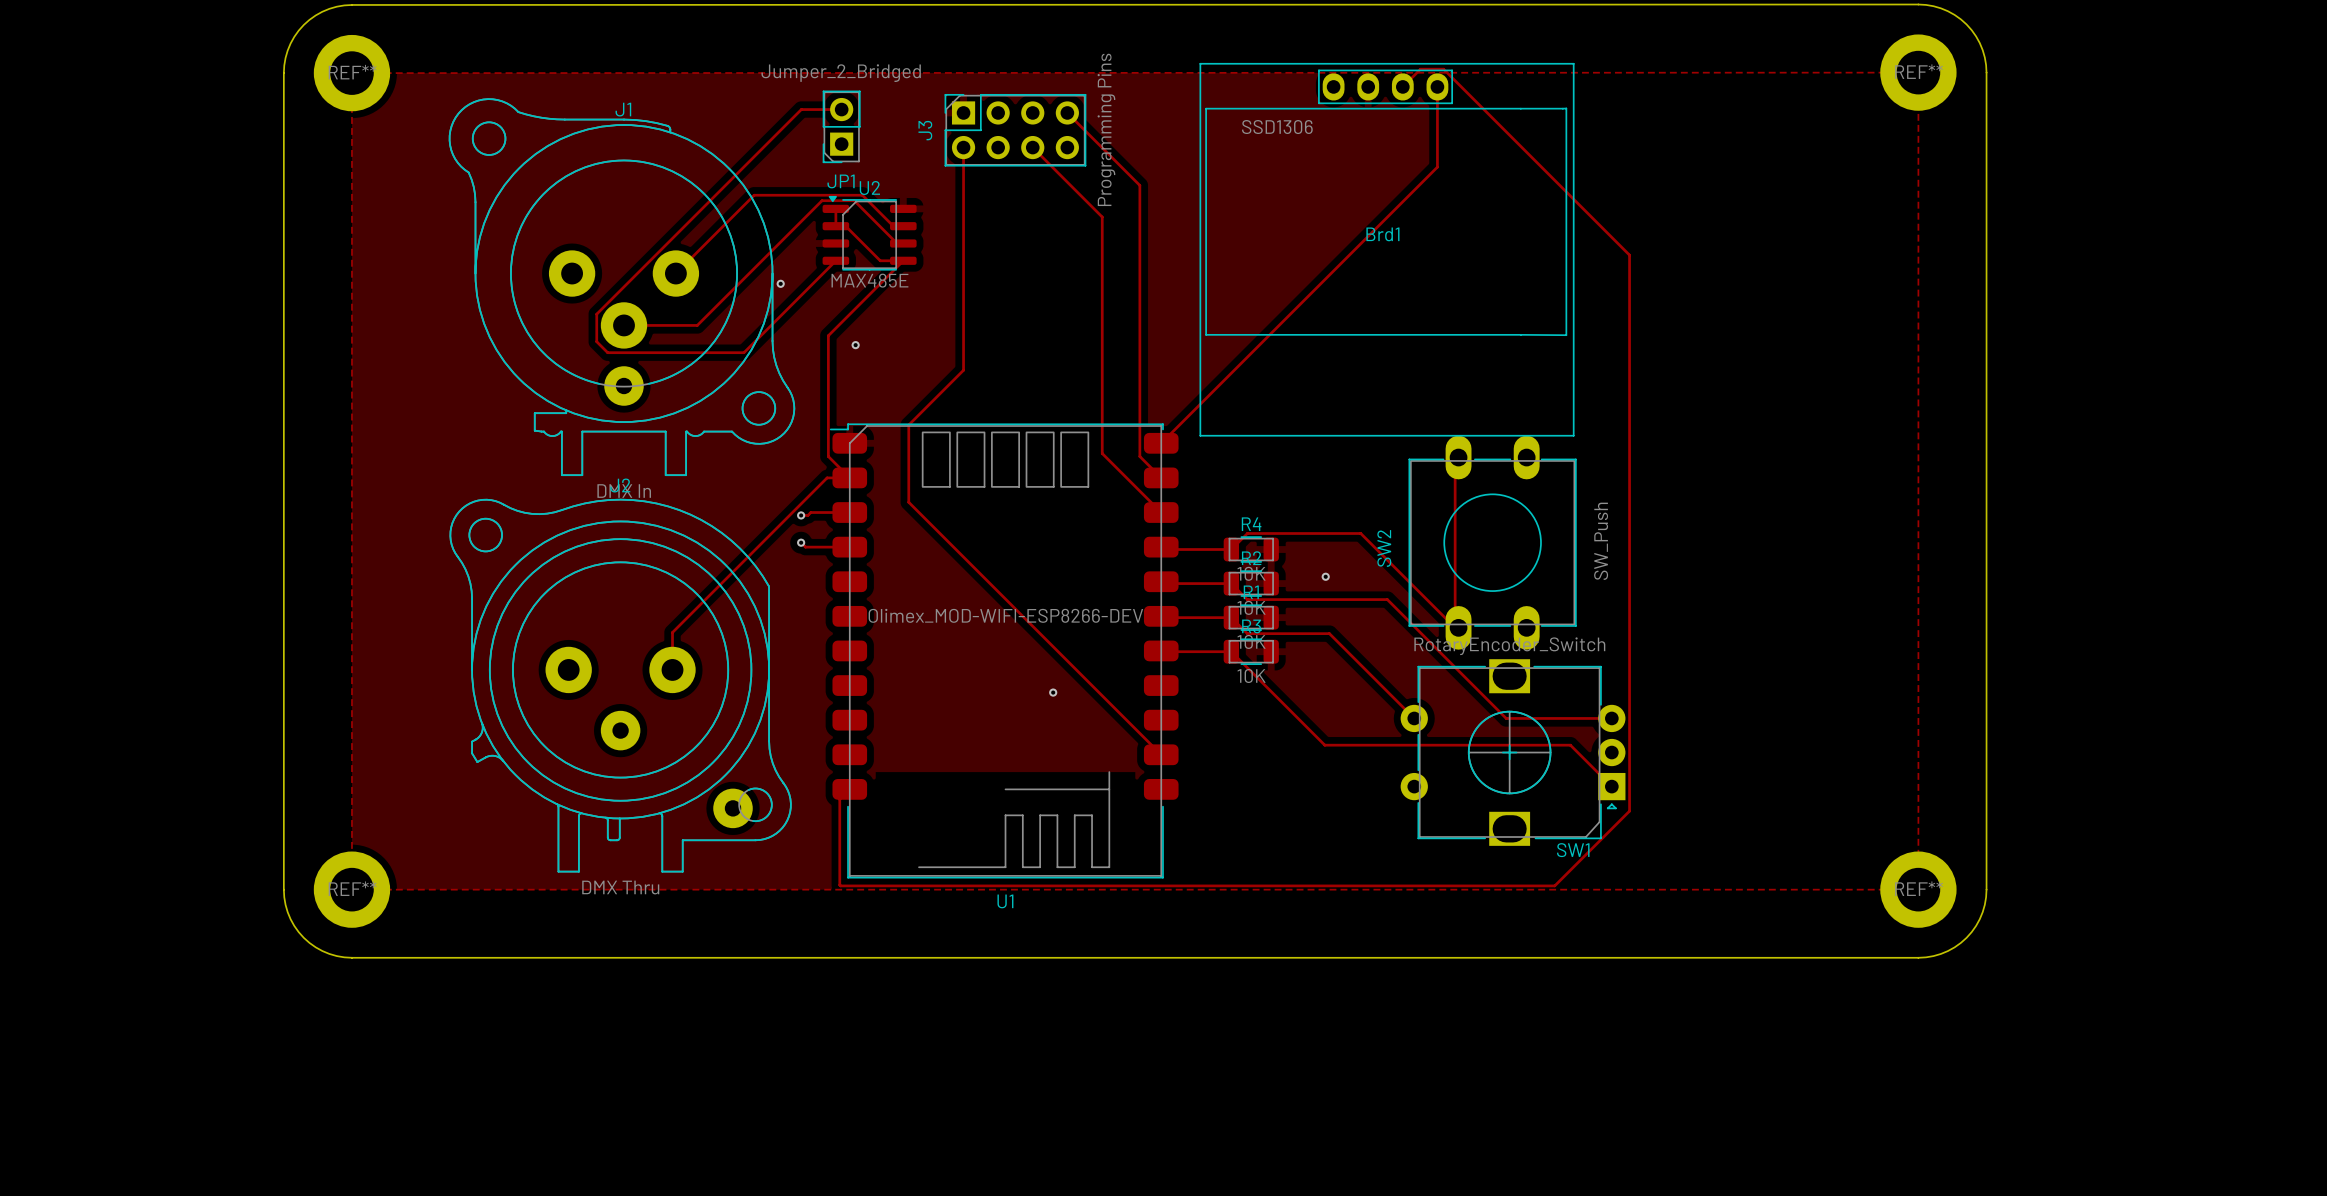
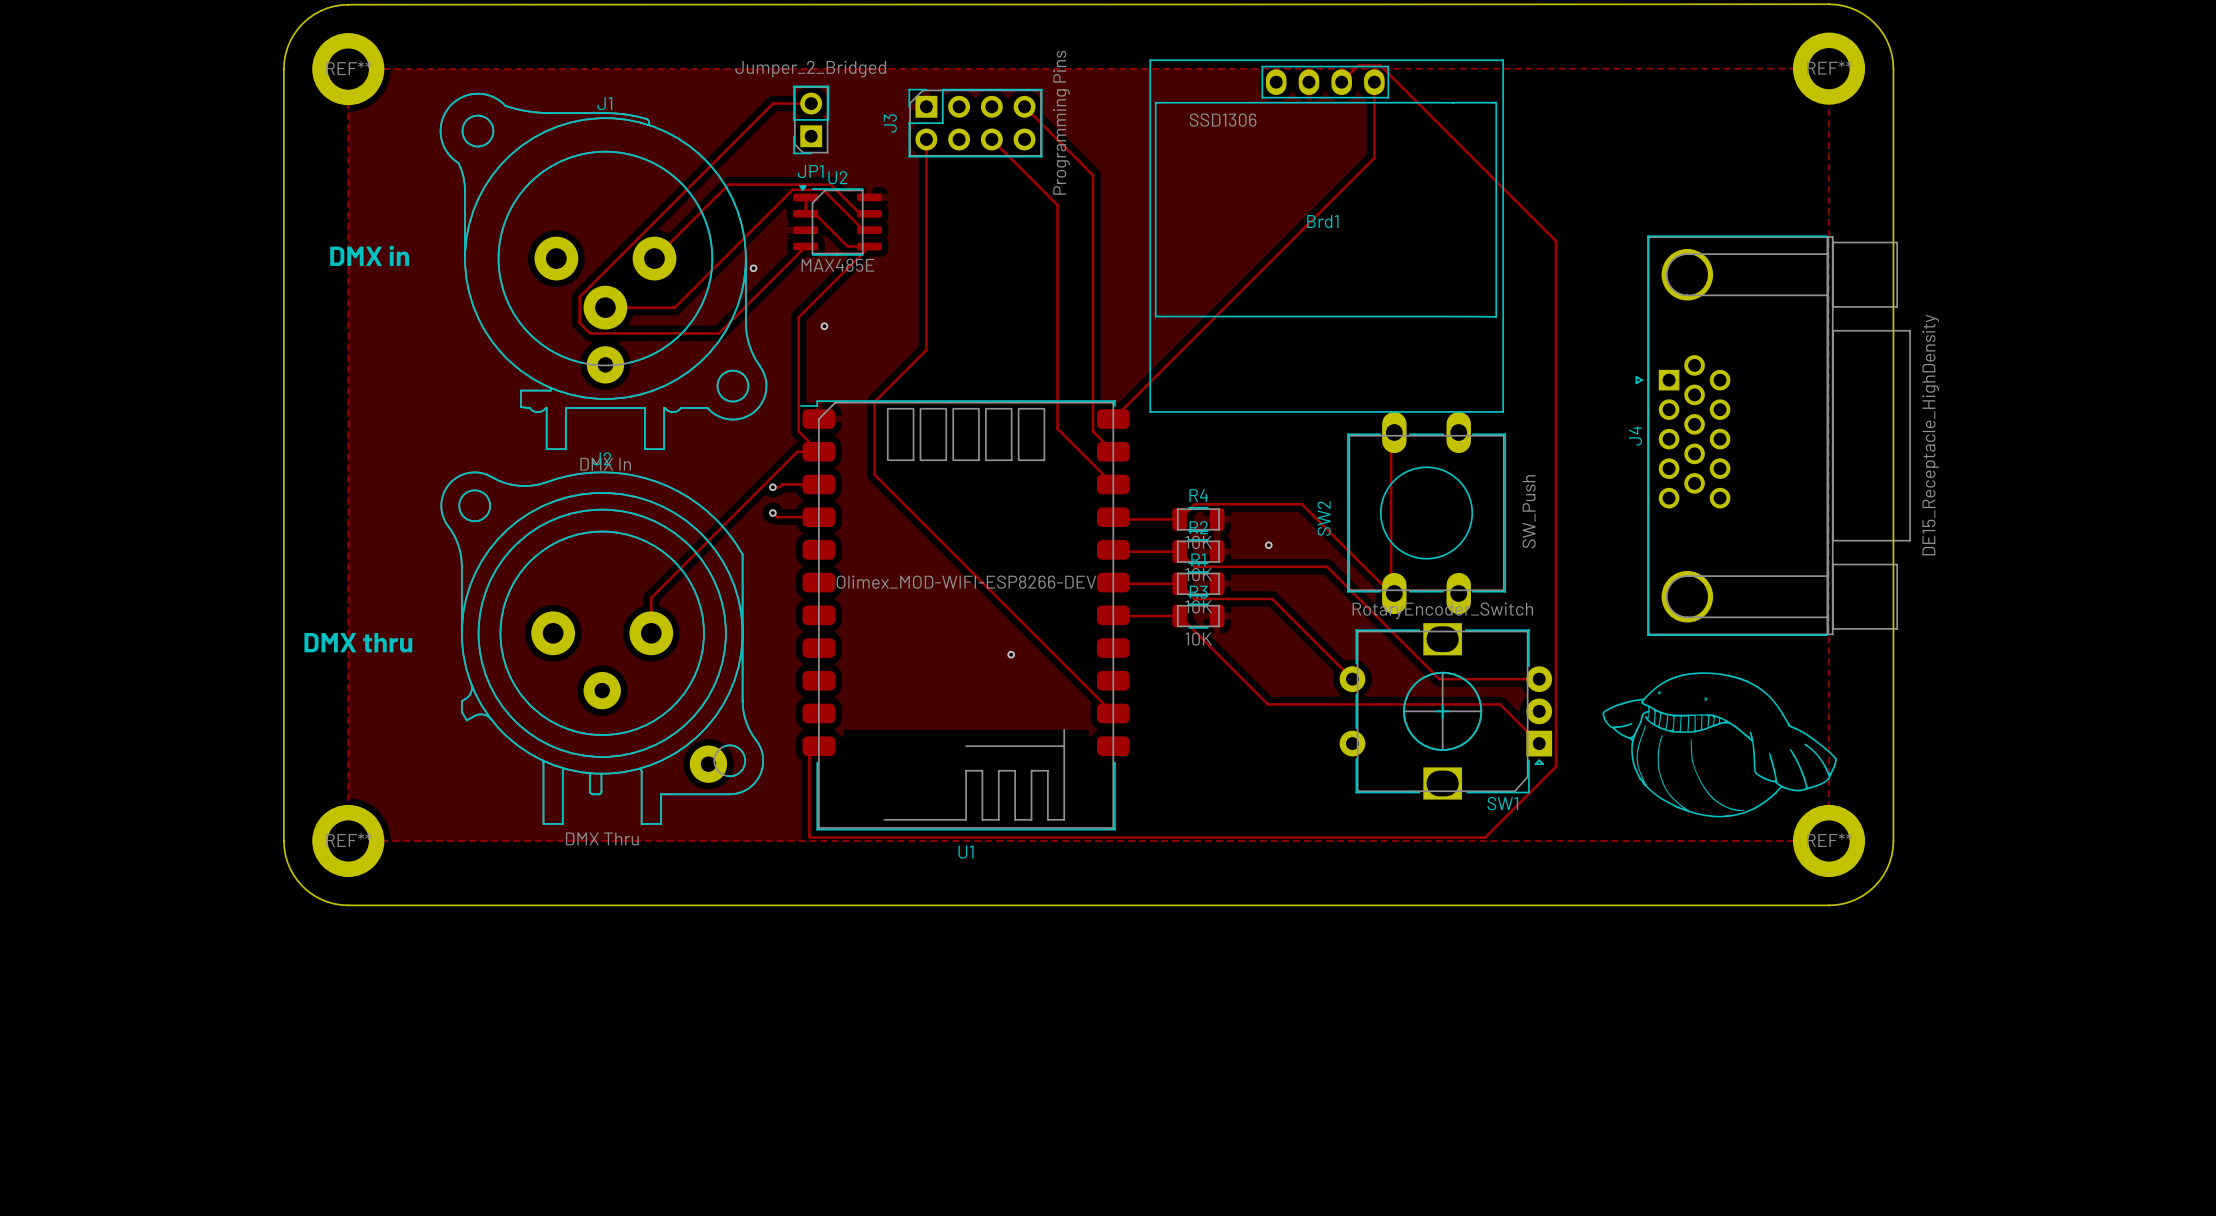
text: none -> DMX in (369, 255)
J4: none -> DE15_Receptacle_HighDensity (1773, 435)
text: none -> DMX thru (358, 642)
drawing: none -> [1601, 672, 1838, 820]

